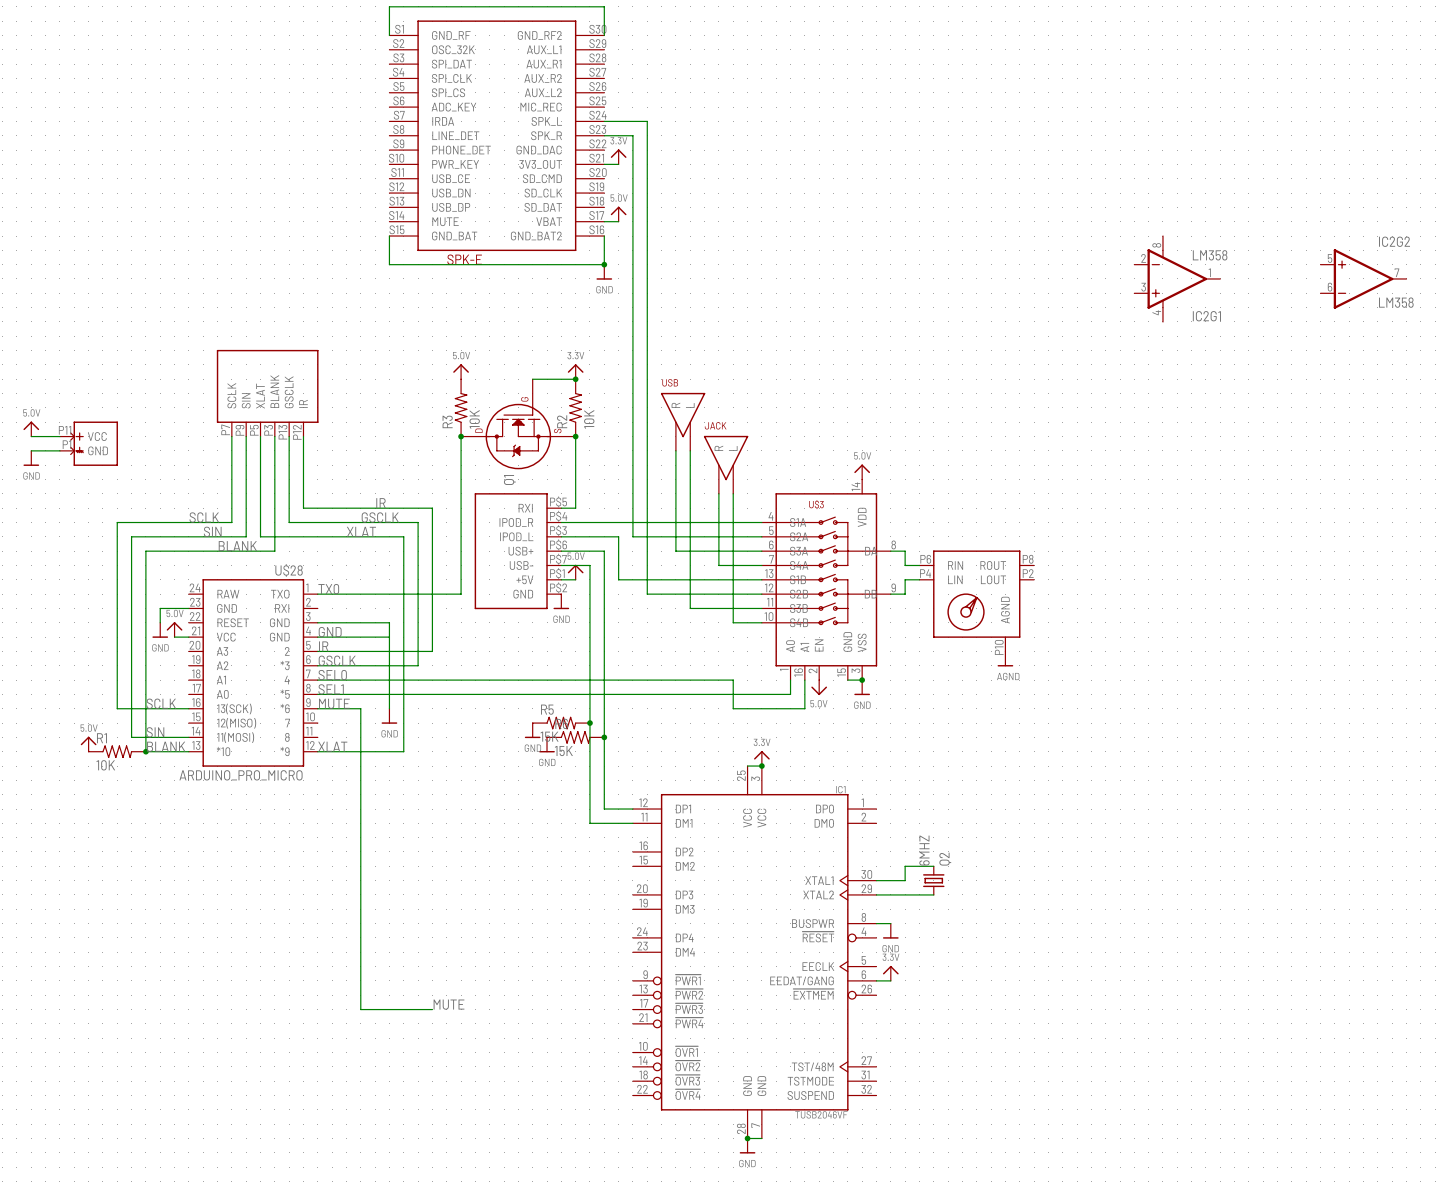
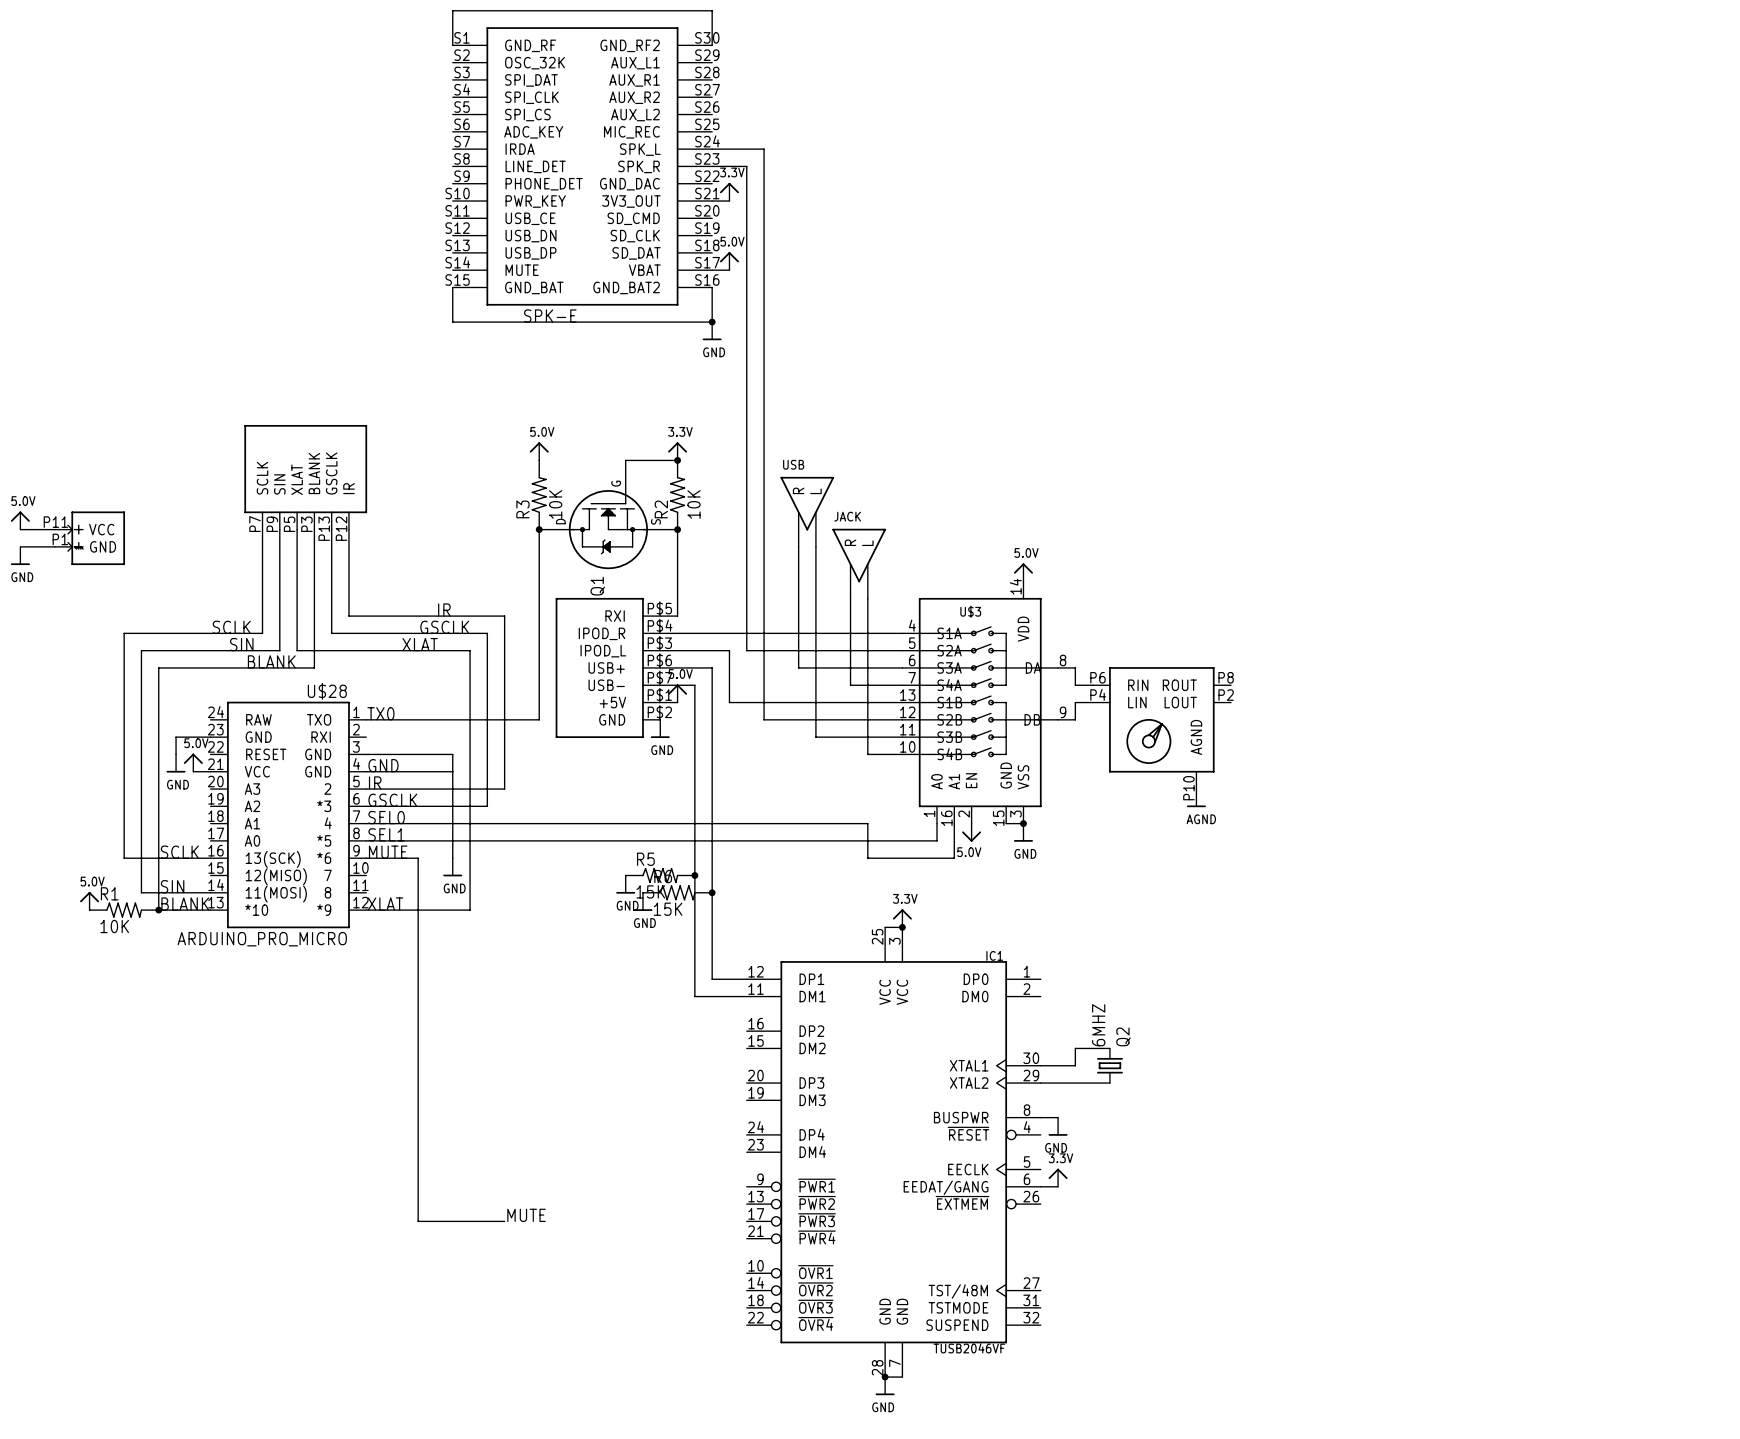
IC2G1: LM358 (1177, 278) -> none
IC2G2: LM358 (1363, 278) -> none

